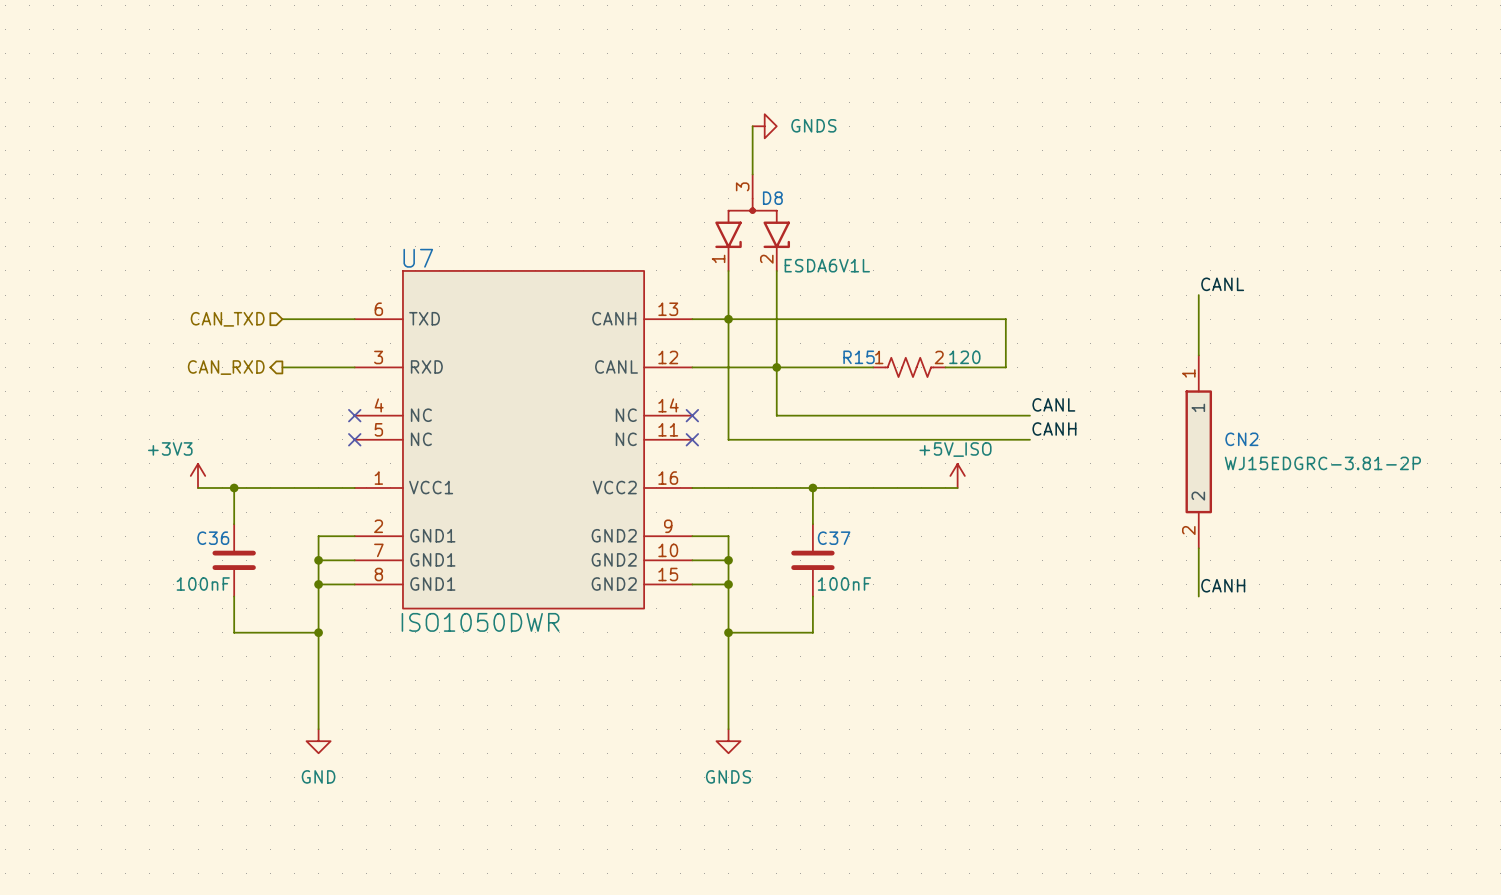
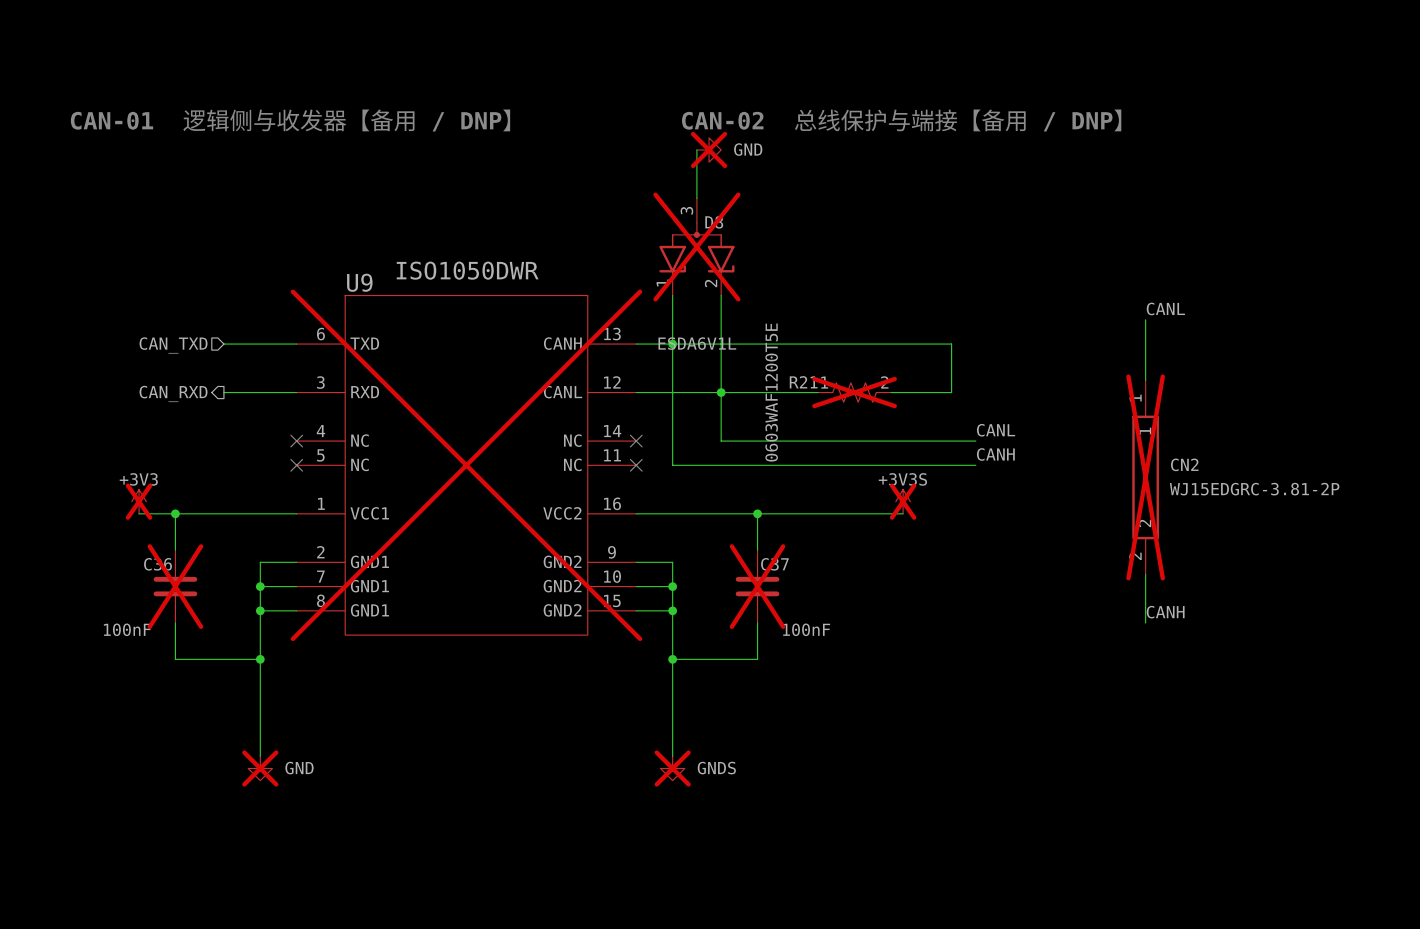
text: none -> CAN-01 逻辑侧与收发器【备用 / DNP】 (290, 120)
text: none -> CAN-02 总线保护与端接【备用 / DNP】 (901, 120)
power symbol: GNDS (764, 126) -> GND (709, 150)
D8 do-not-place cross: none -> (696, 247)
U7 name: U7 (418, 258) -> U9 (359, 282)
D8 value position: ESDA6V1L (827, 265) -> ESDA6V1L (697, 343)
R15 name: R15 (859, 357) -> R21 (803, 382)
R15 value: 120 (964, 357) -> 0603WAF1200T5E (771, 392)
R15 do-not-place cross: none -> (854, 392)
U7 do-not-place cross: none -> (466, 465)
power symbol text position: +3V3 (170, 448) -> +3V3 (138, 479)
CN2 do-not-place cross: none -> (1145, 477)
power symbol do-not-place cross: none -> (139, 501)
power symbol: +5V_ISO (957, 475) -> +3V3S (903, 501)
C36 do-not-place cross: none -> (175, 586)
C37 do-not-place cross: none -> (757, 586)
C36 value position: 100nF (203, 584) -> 100nF (127, 629)
C37 value position: 100nF (844, 584) -> 100nF (806, 629)
U7 value position: ISO1050DWR (480, 622) -> ISO1050DWR (467, 270)
power symbol do-not-place cross: none -> (260, 768)
power symbol do-not-place cross: none -> (672, 768)
power symbol text position: GND (318, 776) -> GND (299, 768)
power symbol text position: GNDS (728, 776) -> GNDS (716, 768)

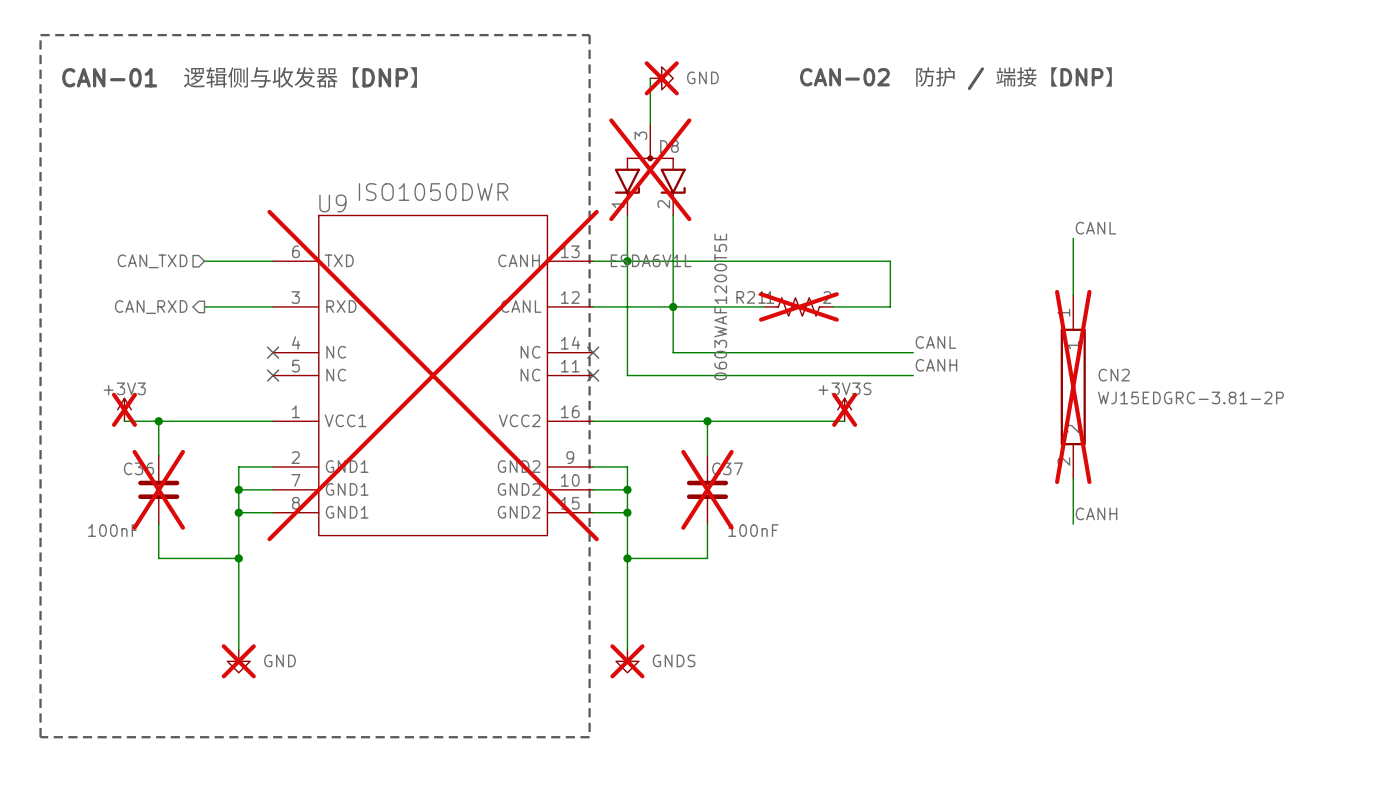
line: none -> (40, 35) (589, 35) (589, 737) (40, 737) (40, 35)
text: CAN-01 逻辑侧与收发器【备用 / DNP】 (290, 120) -> CAN-01 逻辑侧与收发器【DNP】 (240, 77)
text: CAN-02 总线保护与端接【备用 / DNP】 (901, 120) -> CAN-02 防护 / 端接【DNP】 (956, 77)

